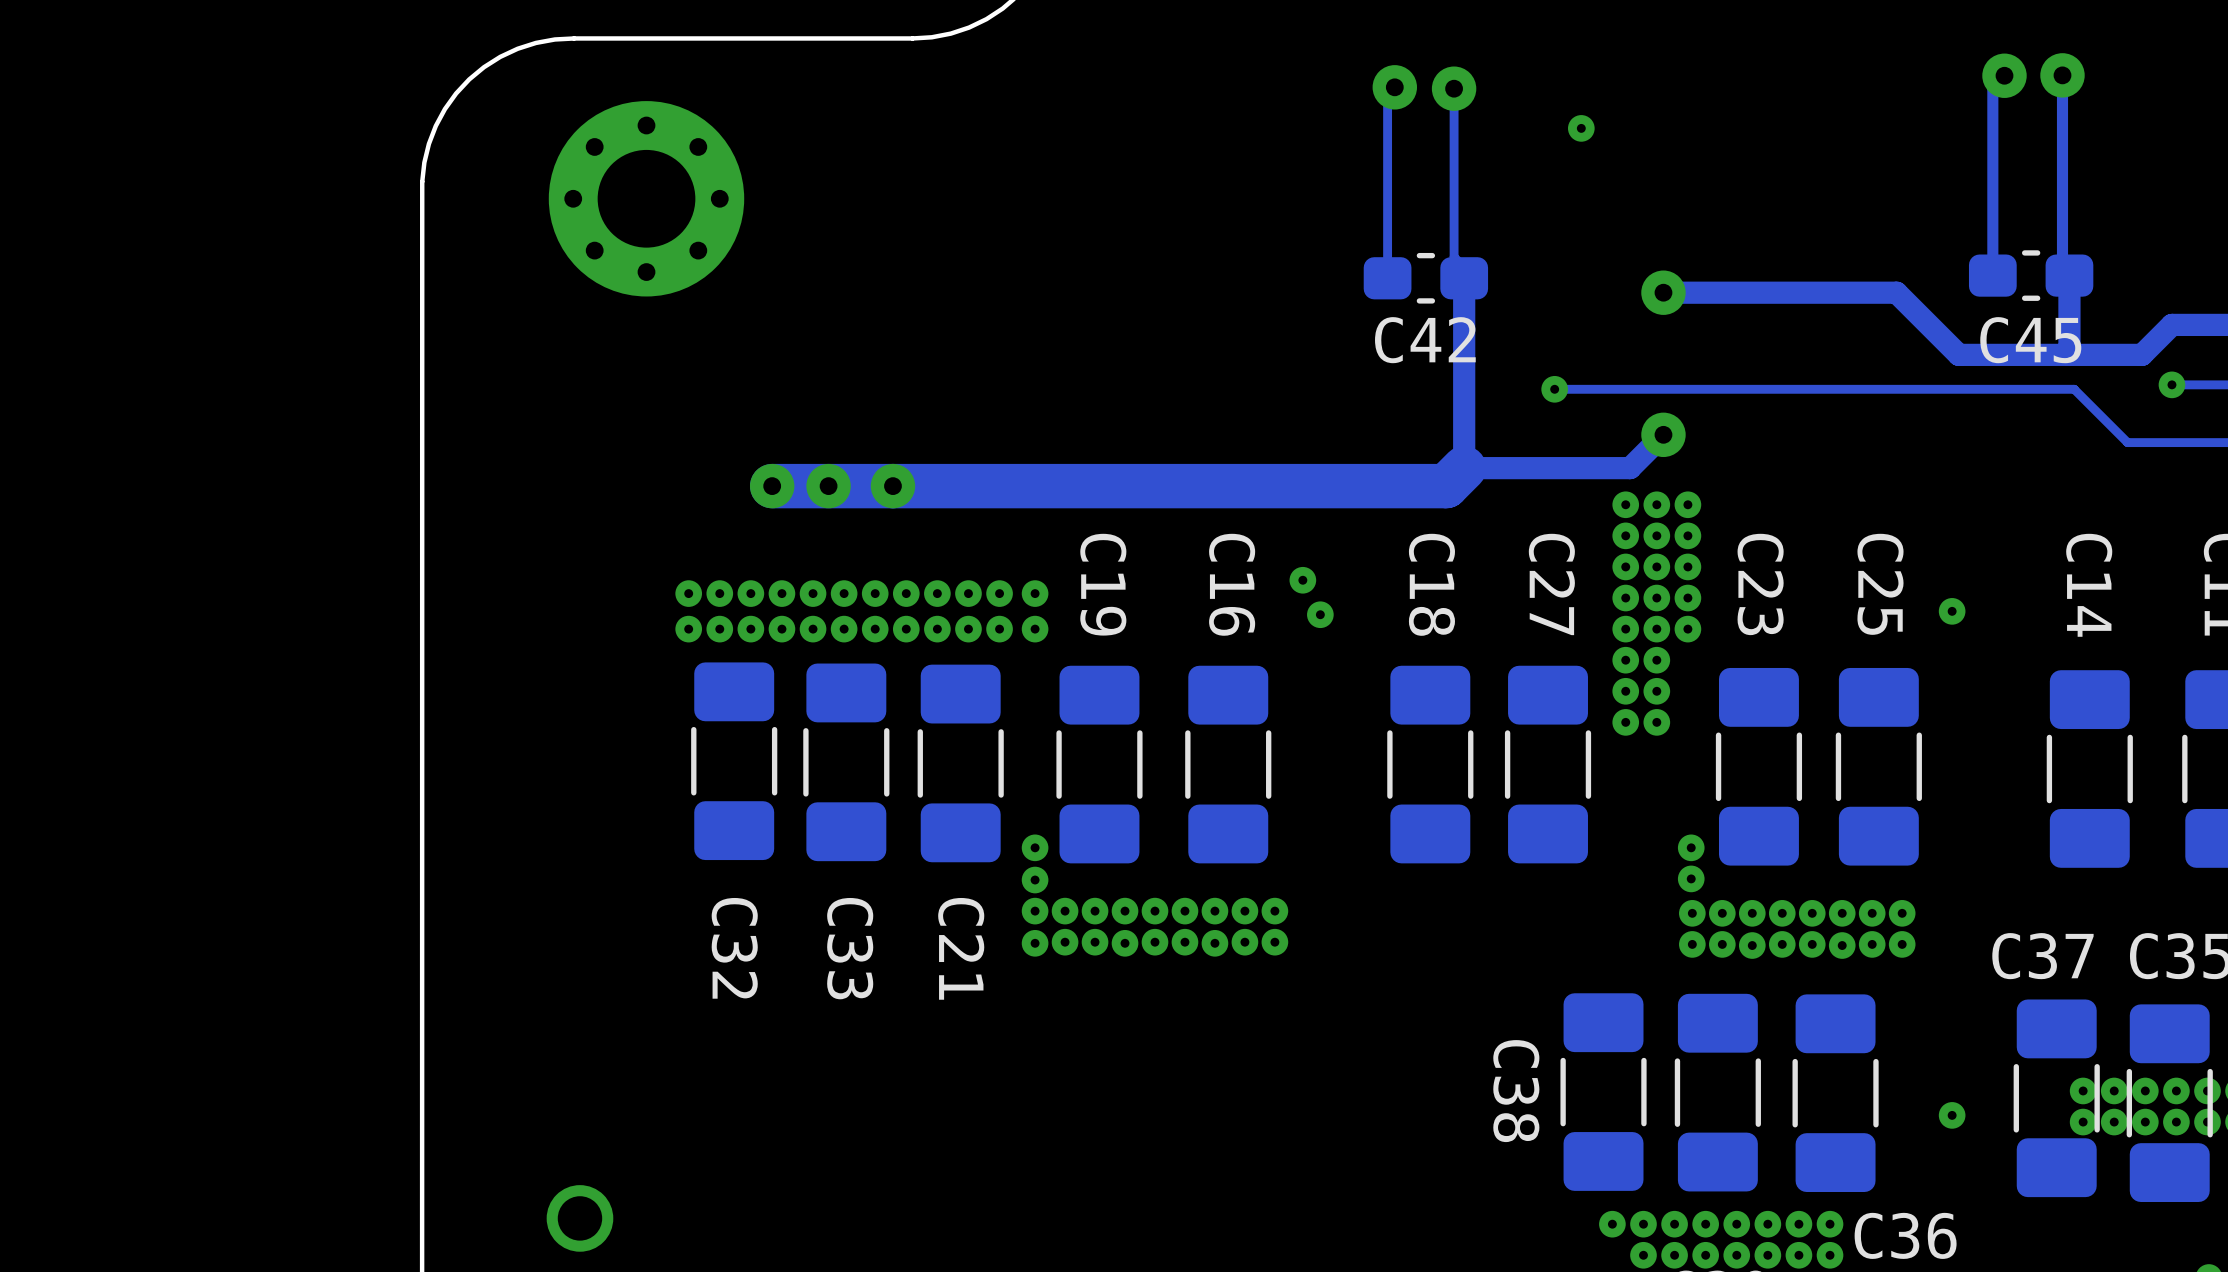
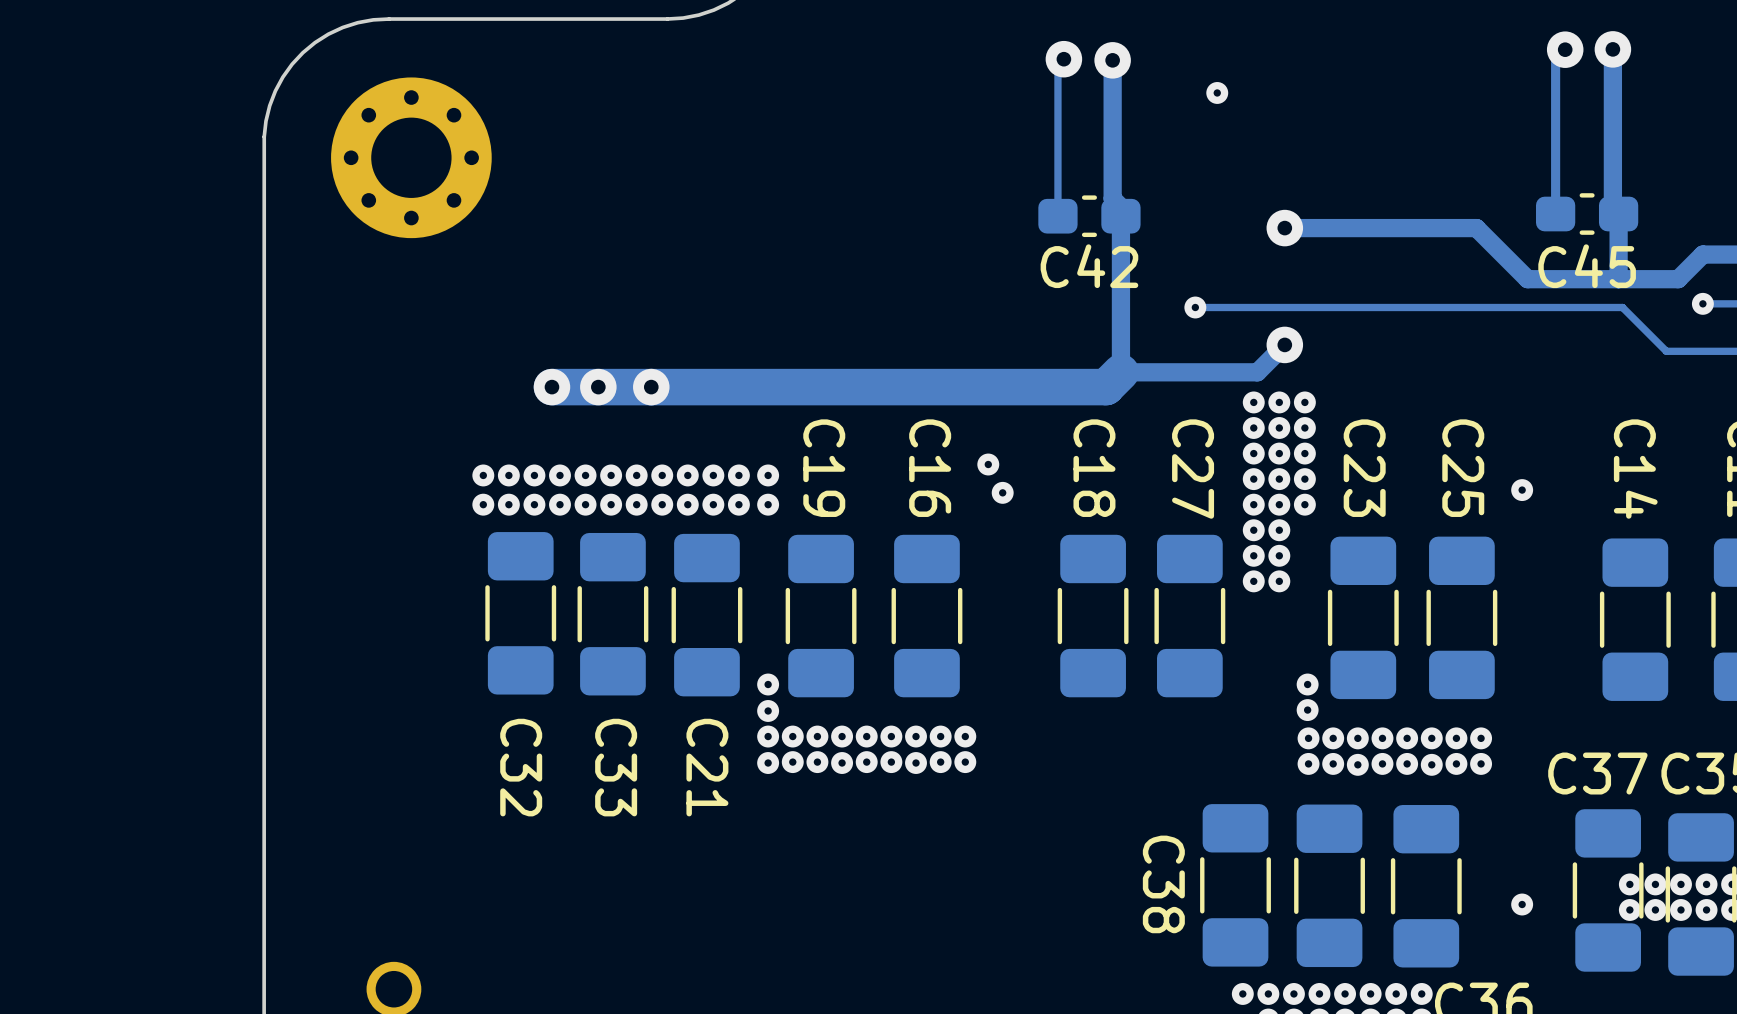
track width: thin (2062, 75) (2062, 268) (2069, 275) -> thick (1612, 49) (1612, 208) (1618, 214)
track width: thin (1454, 88) (1454, 257) (1468, 271) -> thick (1112, 60) (1112, 198) (1124, 210)
part position: (646, 198) -> (411, 157)

